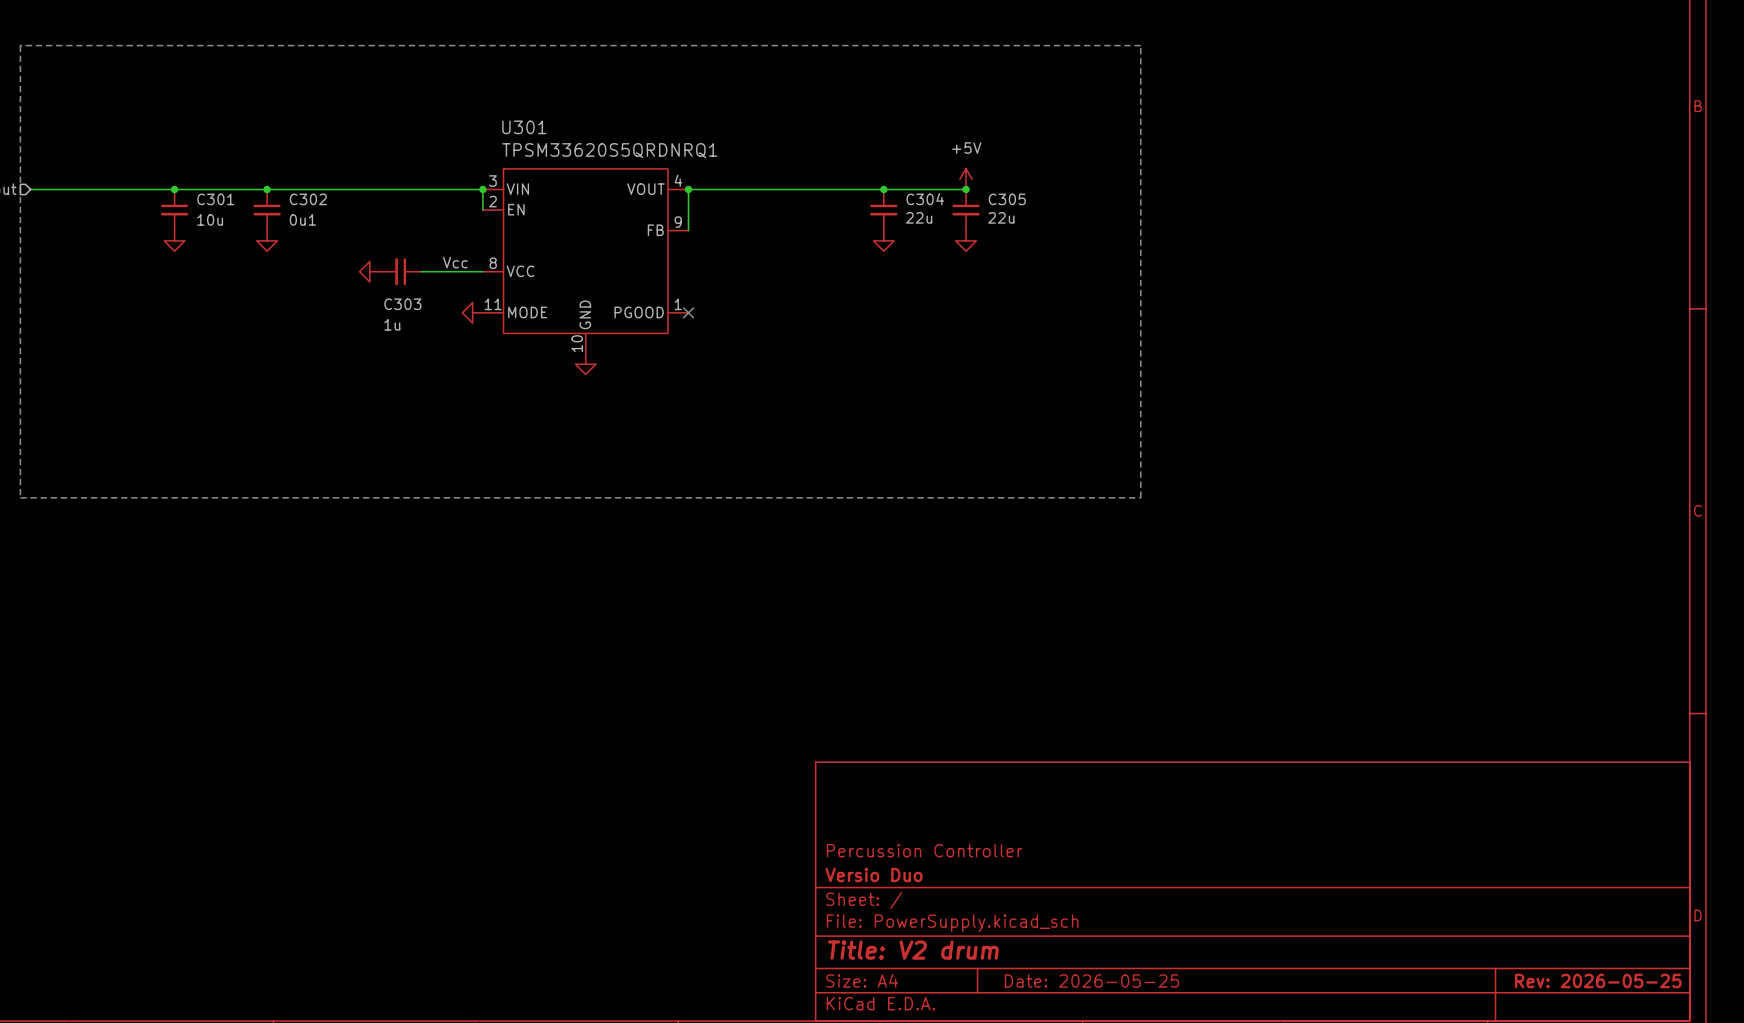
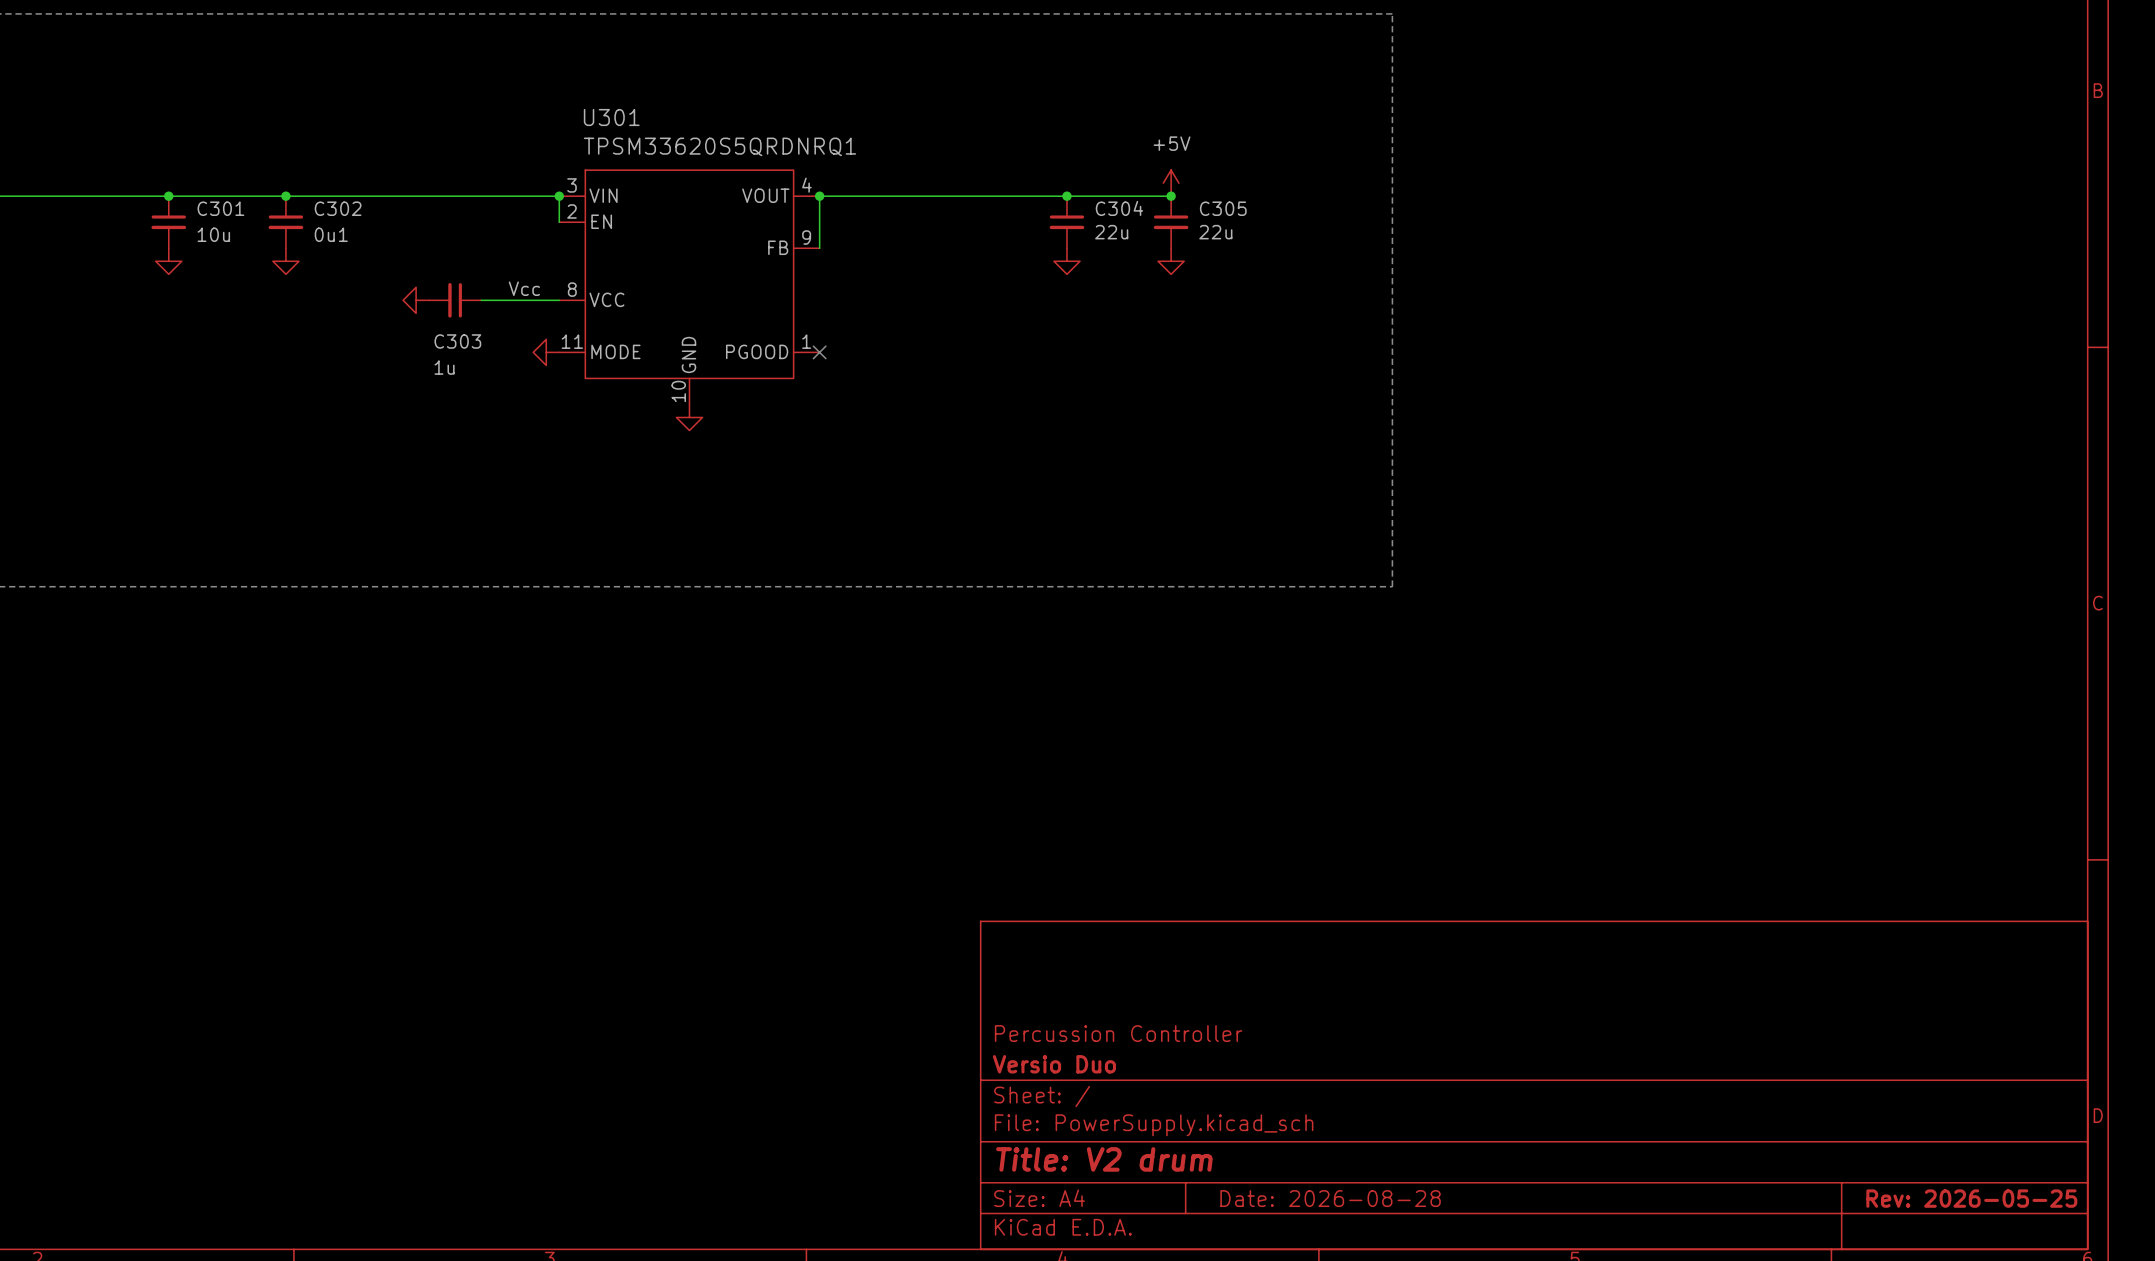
title block: Date: 2026-05-25 (1091, 980) -> Date: 2026-08-28 (1330, 1198)

